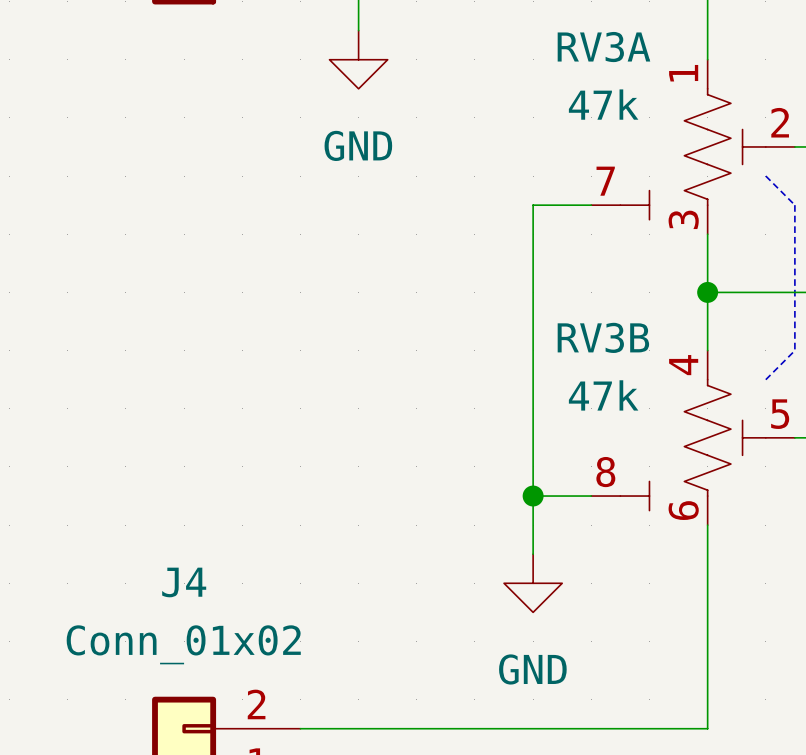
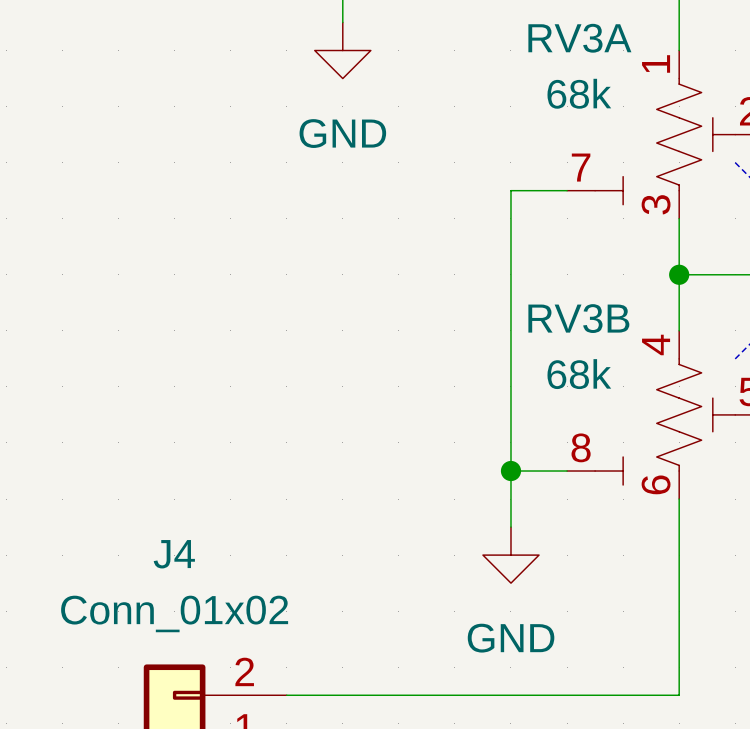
RV3A value: 47k (603, 104) -> 68k (579, 93)
RV3B value: 47k (603, 395) -> 68k (579, 374)

